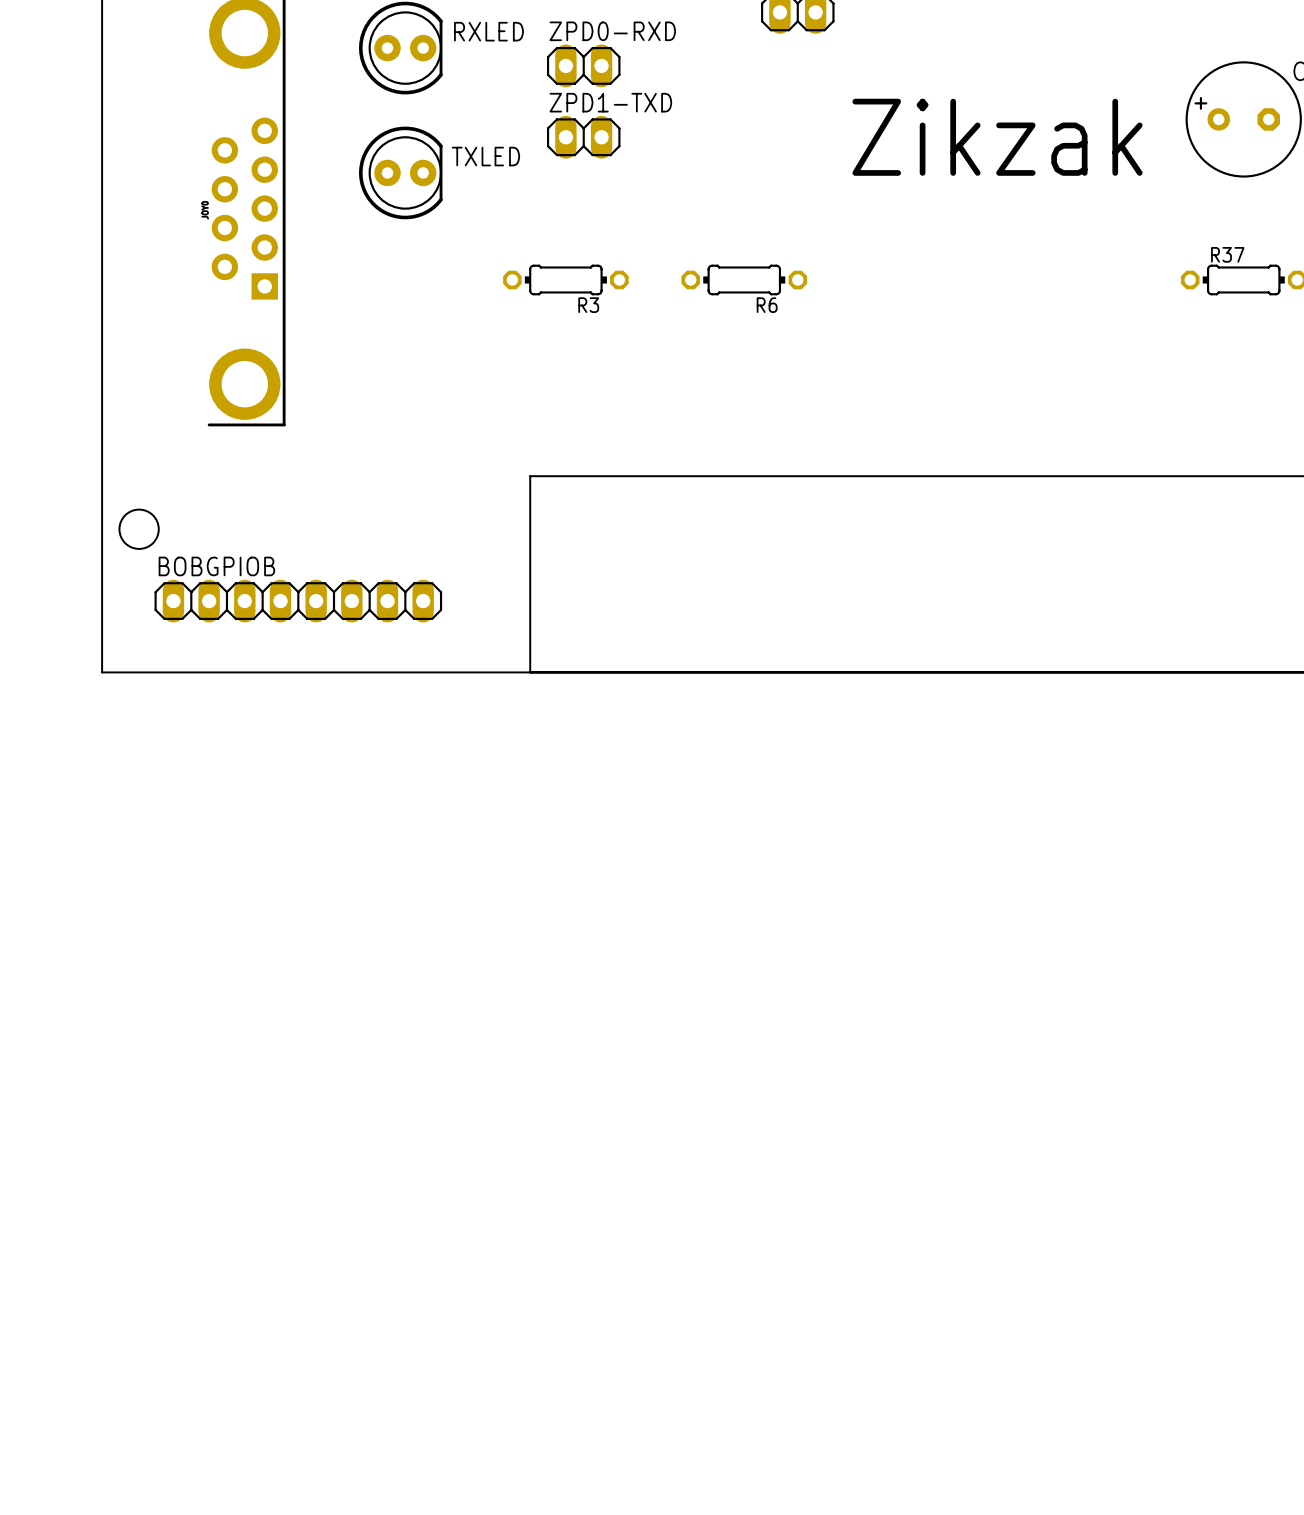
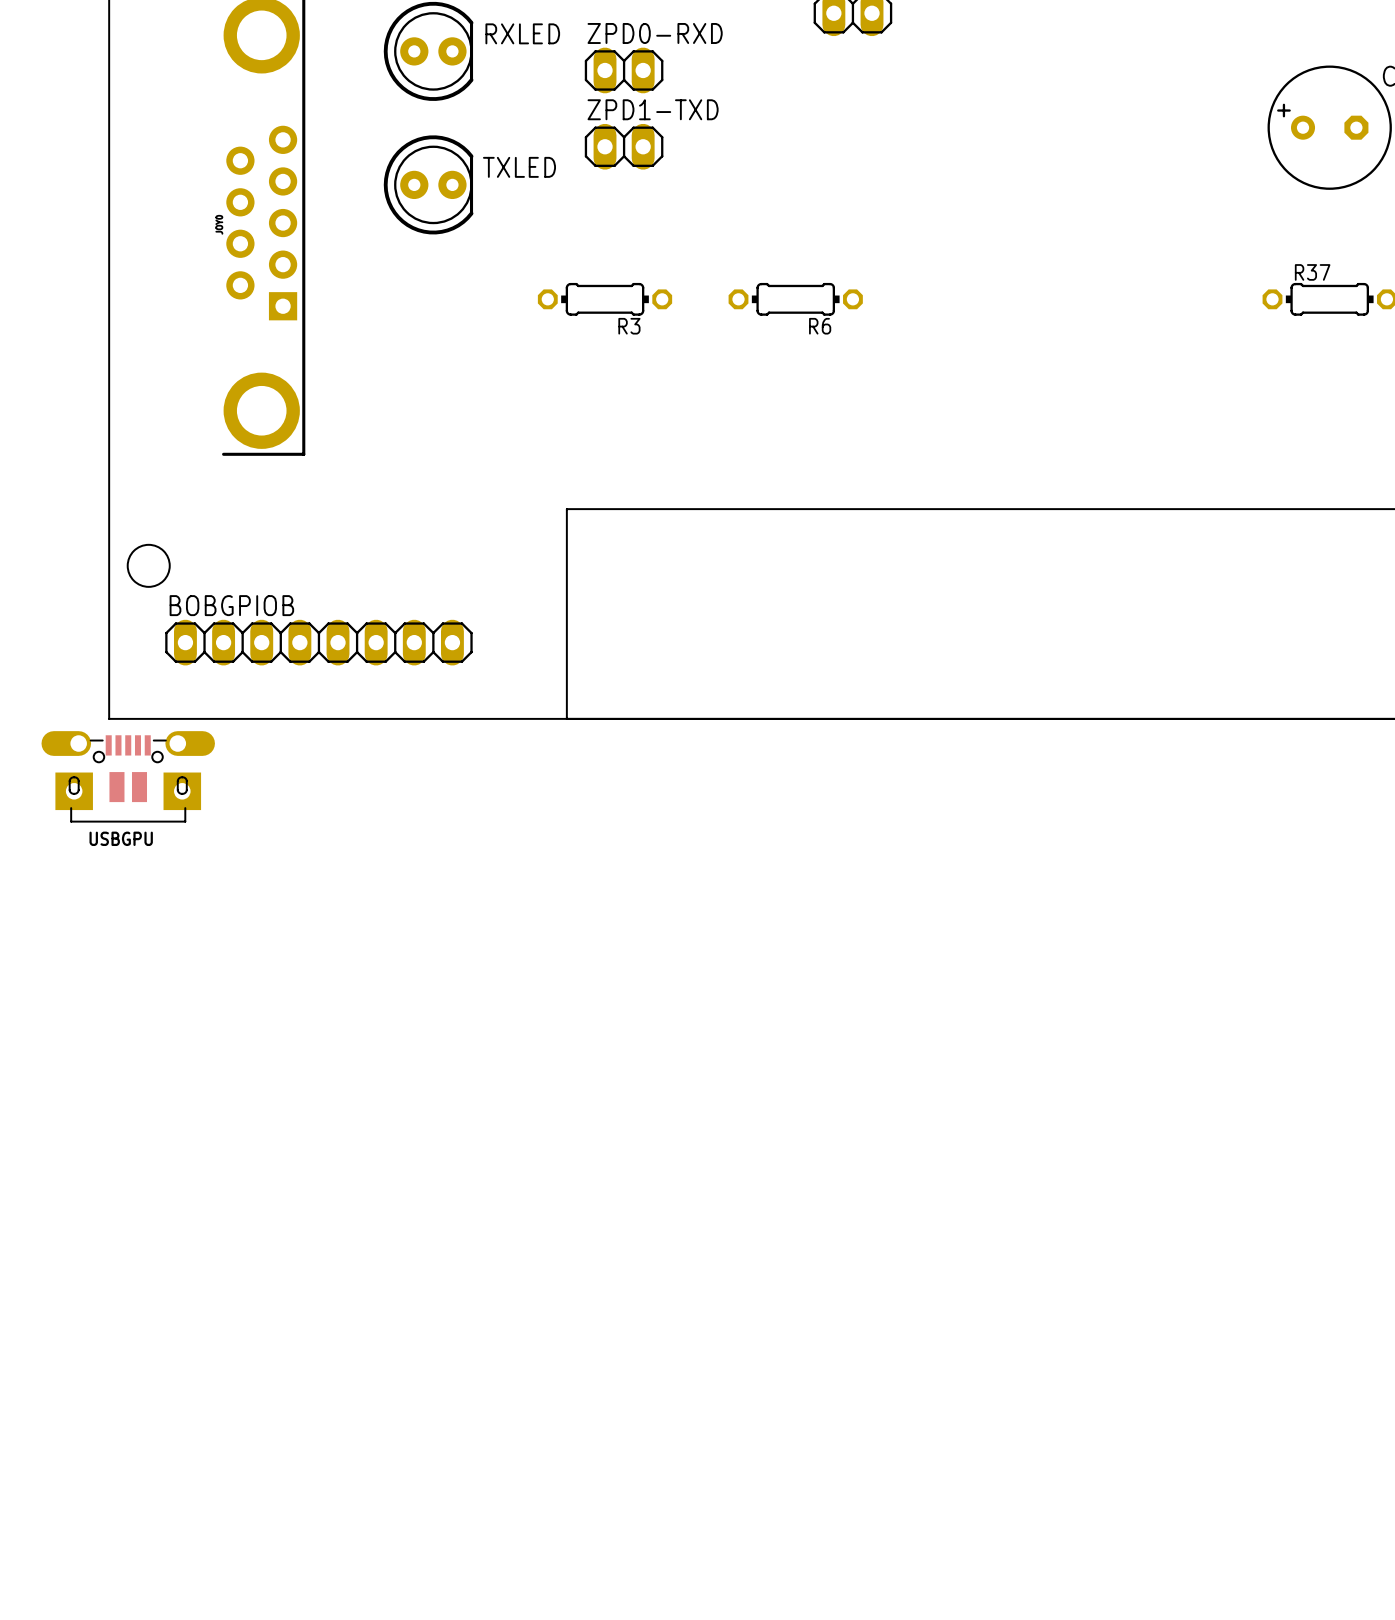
text: Zikzak (997, 137) -> none
USBGPU: none -> (128, 776)

